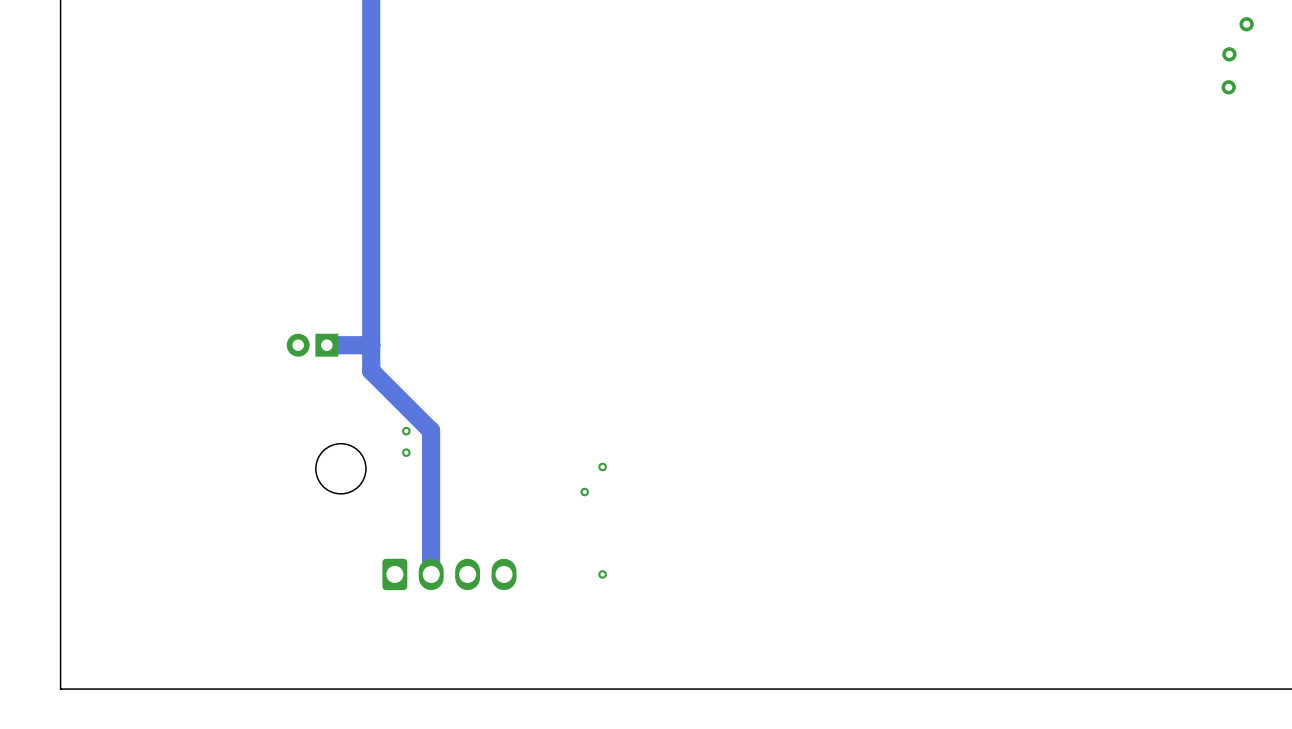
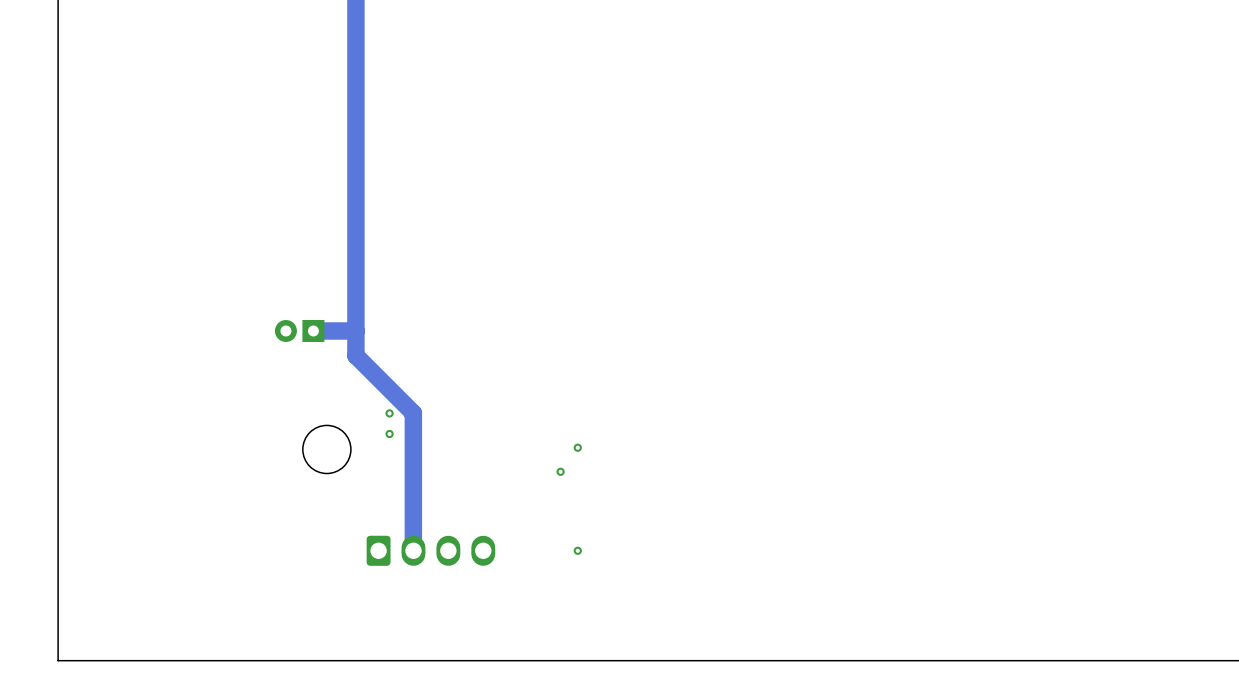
via: (1246, 24) -> none
via: (1229, 54) -> none
via: (1228, 87) -> none

